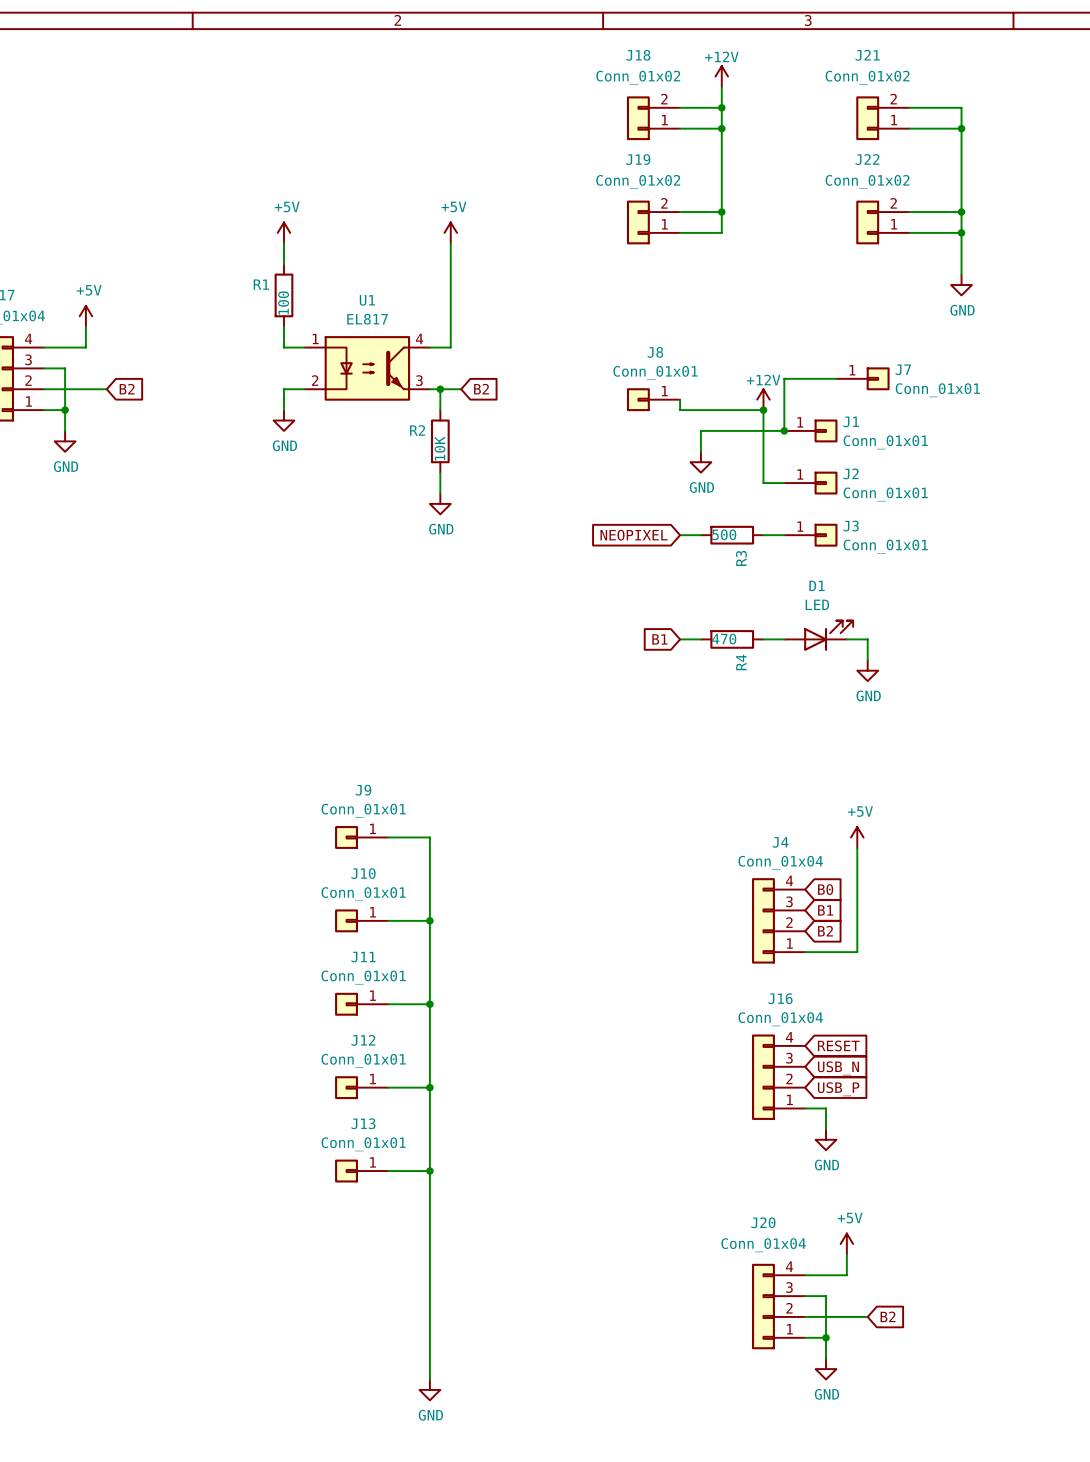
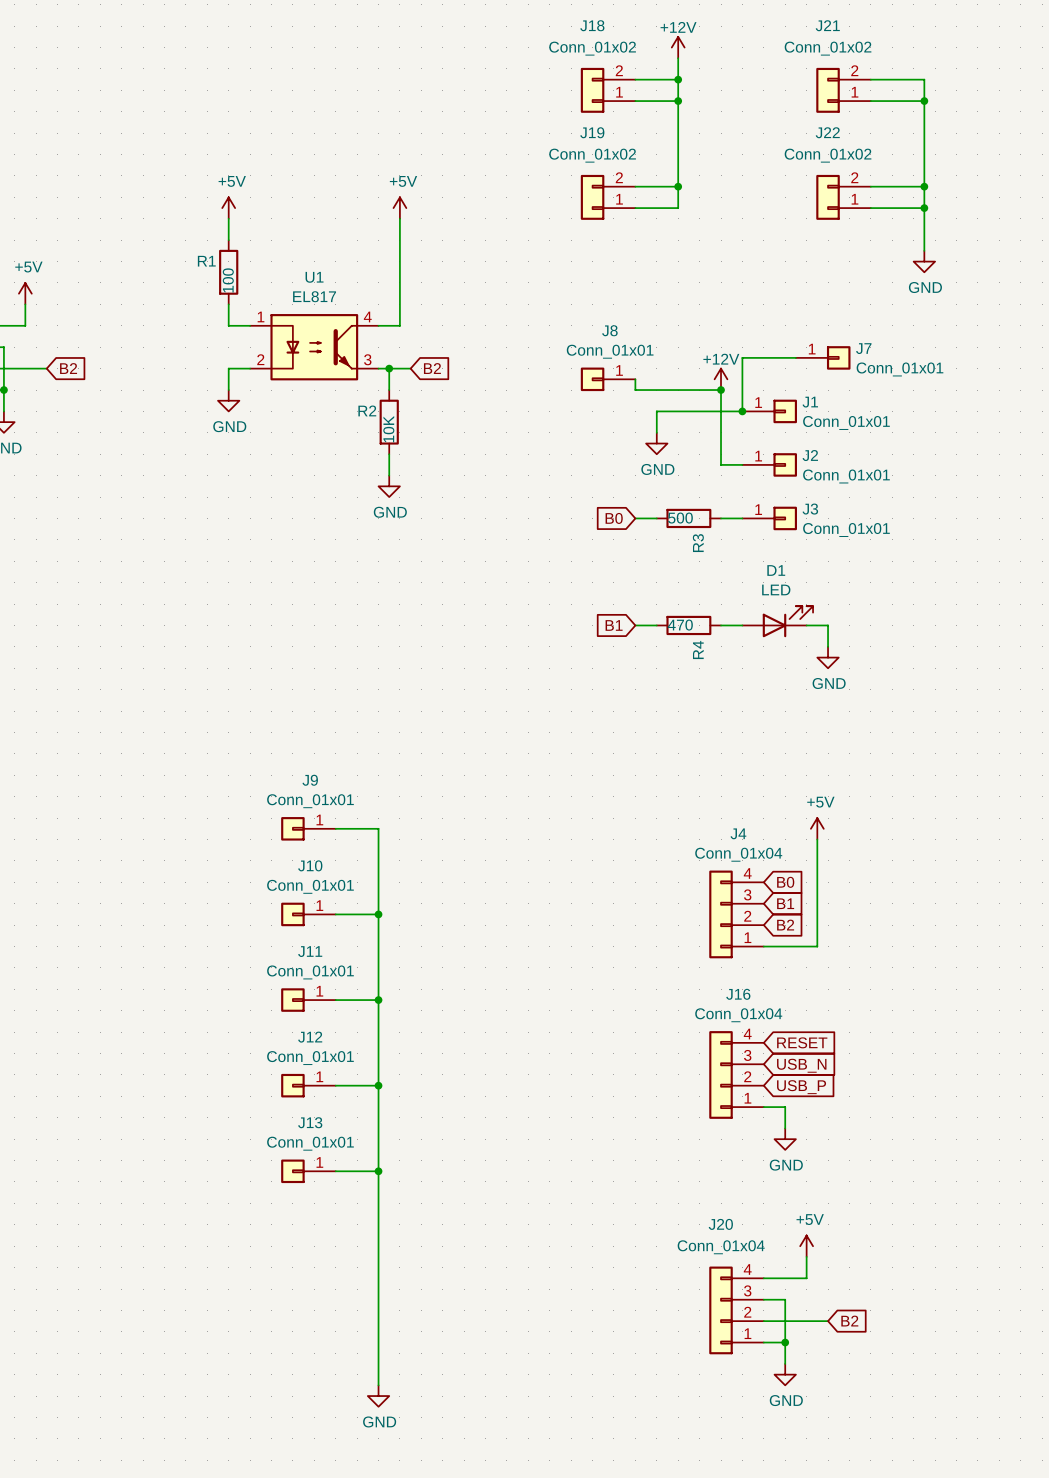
global label: NEOPIXEL (634, 535) -> B0 (614, 518)

